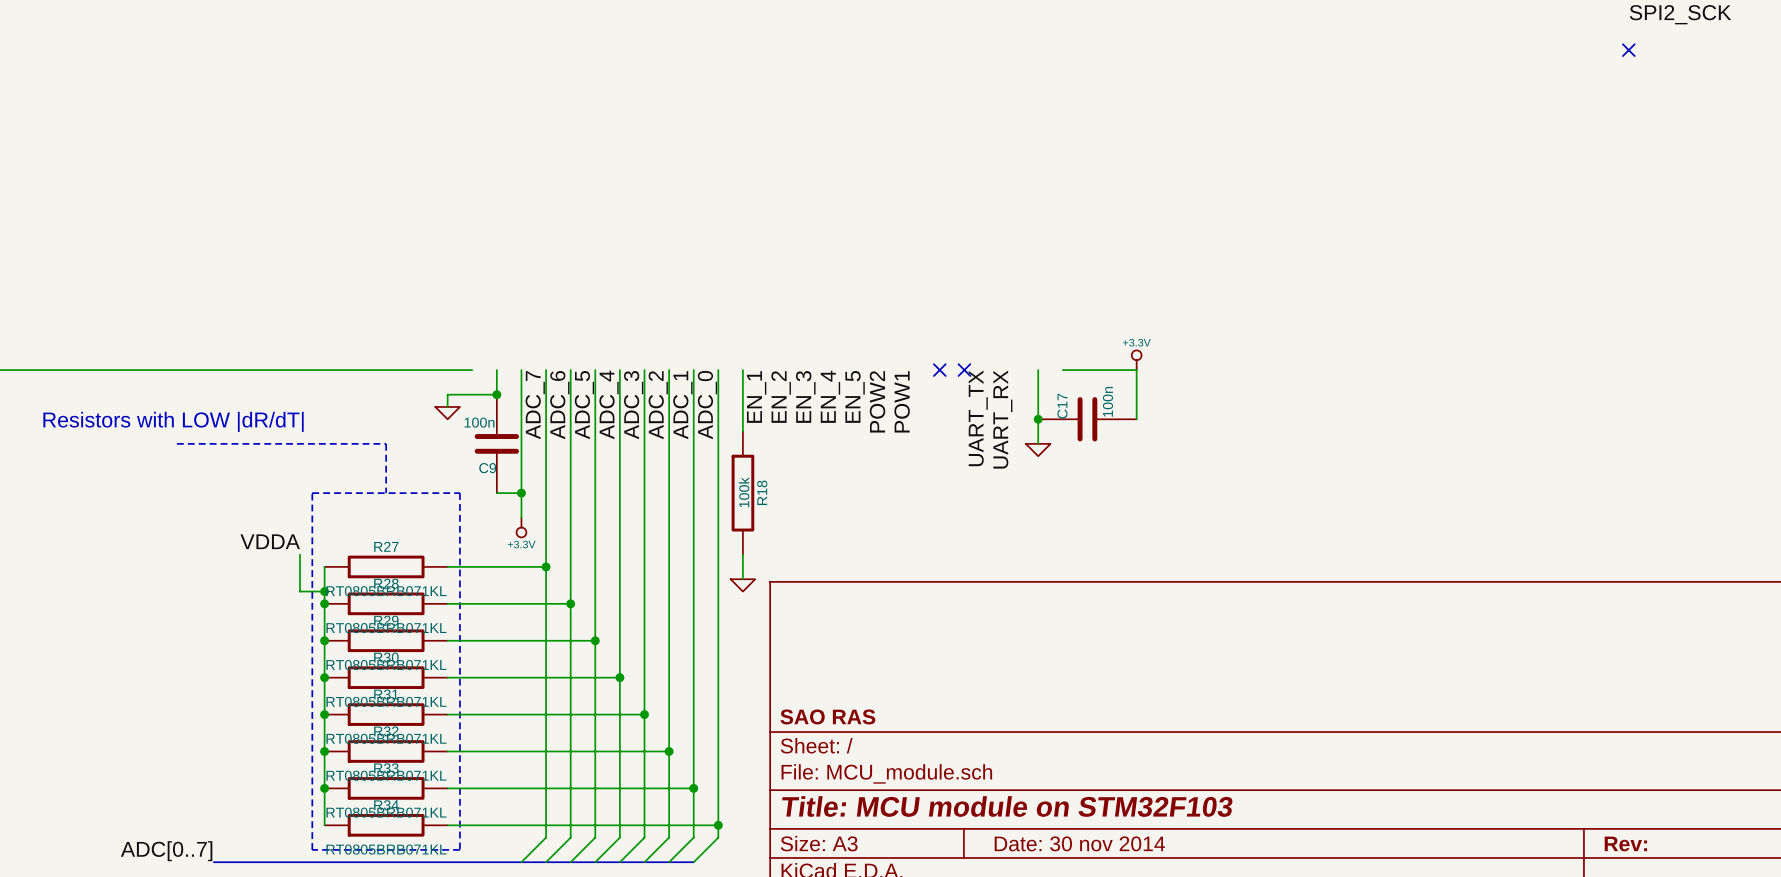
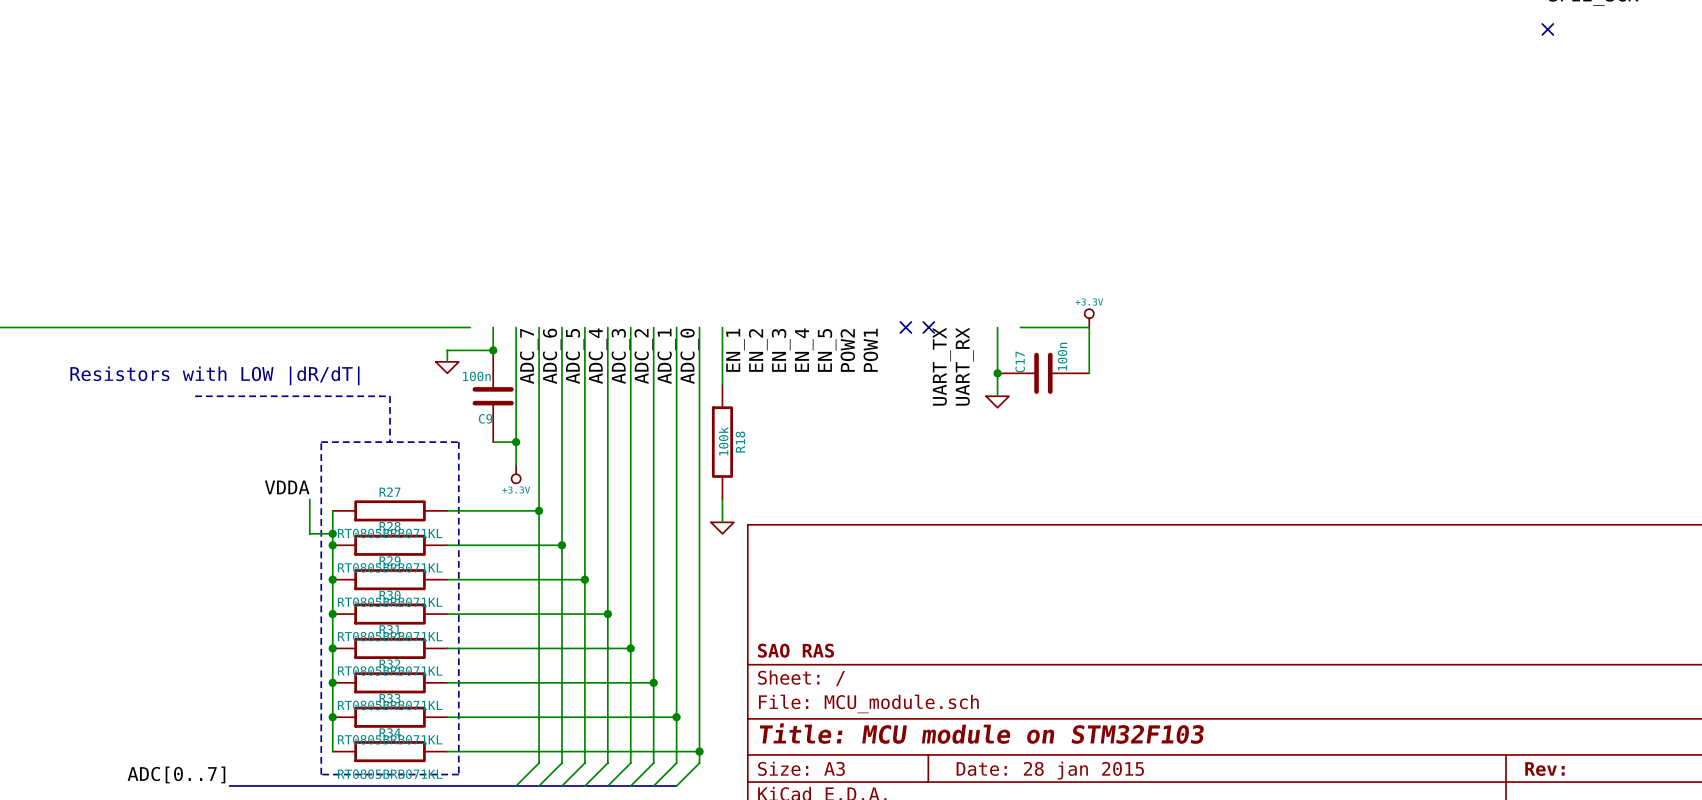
title block: Date: 30 nov 2014 (1079, 843) -> Date: 28 jan 2015 (1050, 770)

